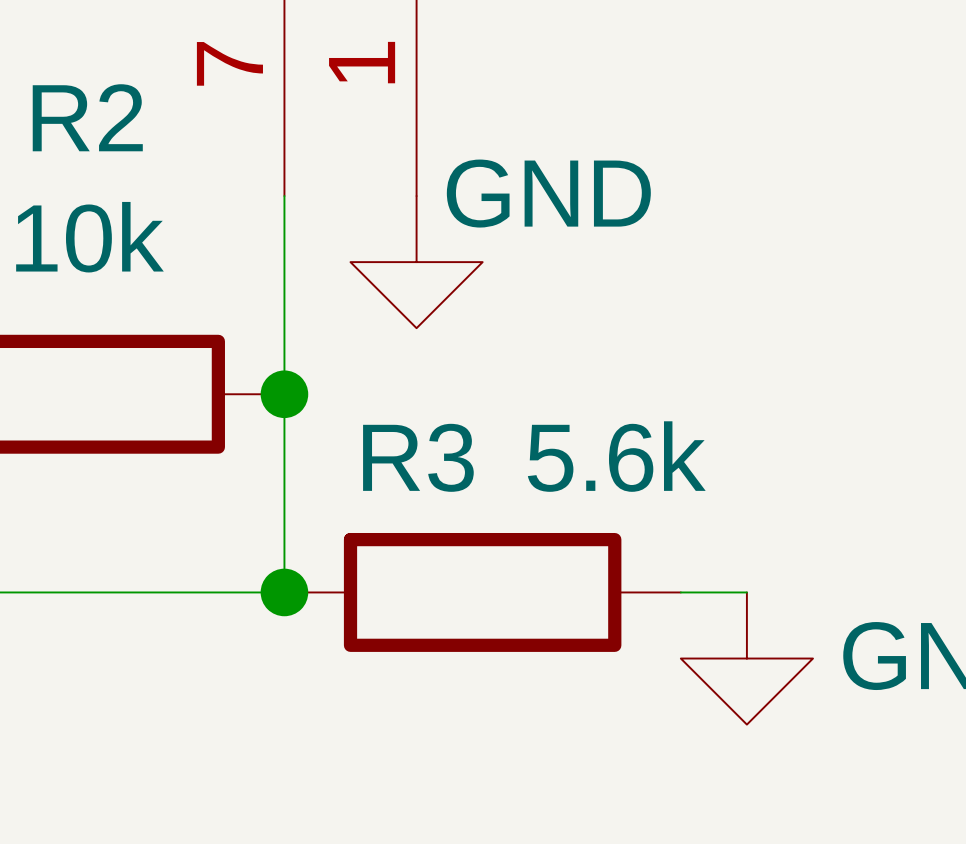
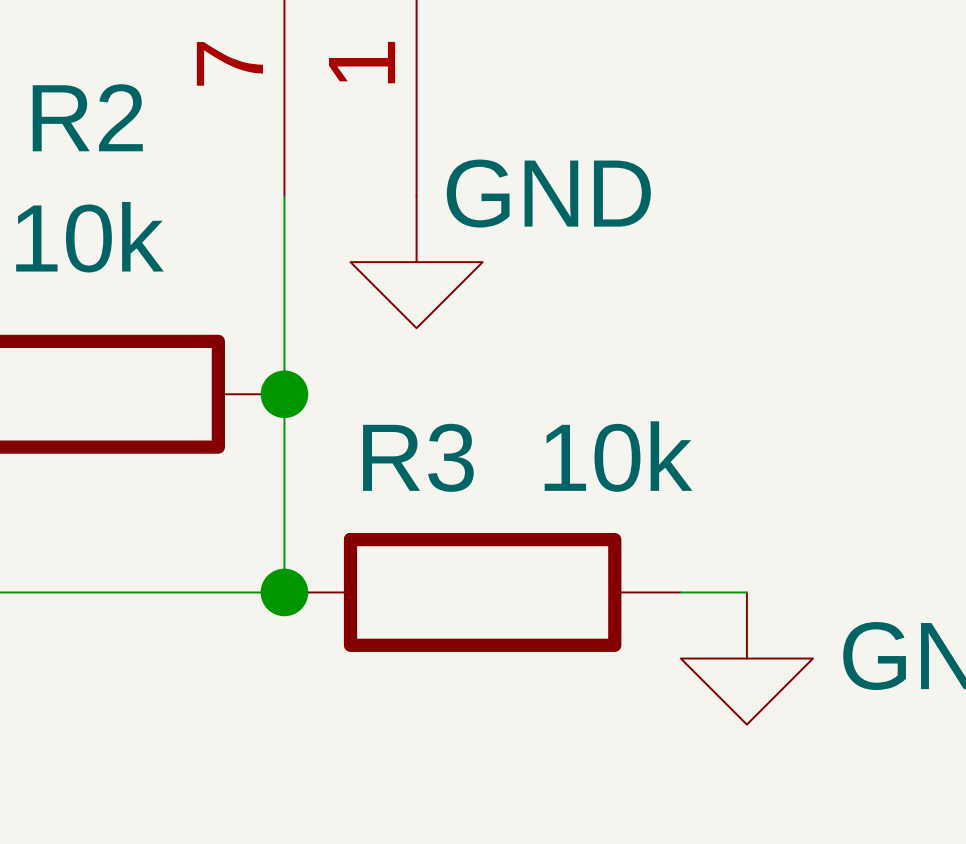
R3 value: 5.6k (616, 456) -> 10k (618, 456)

